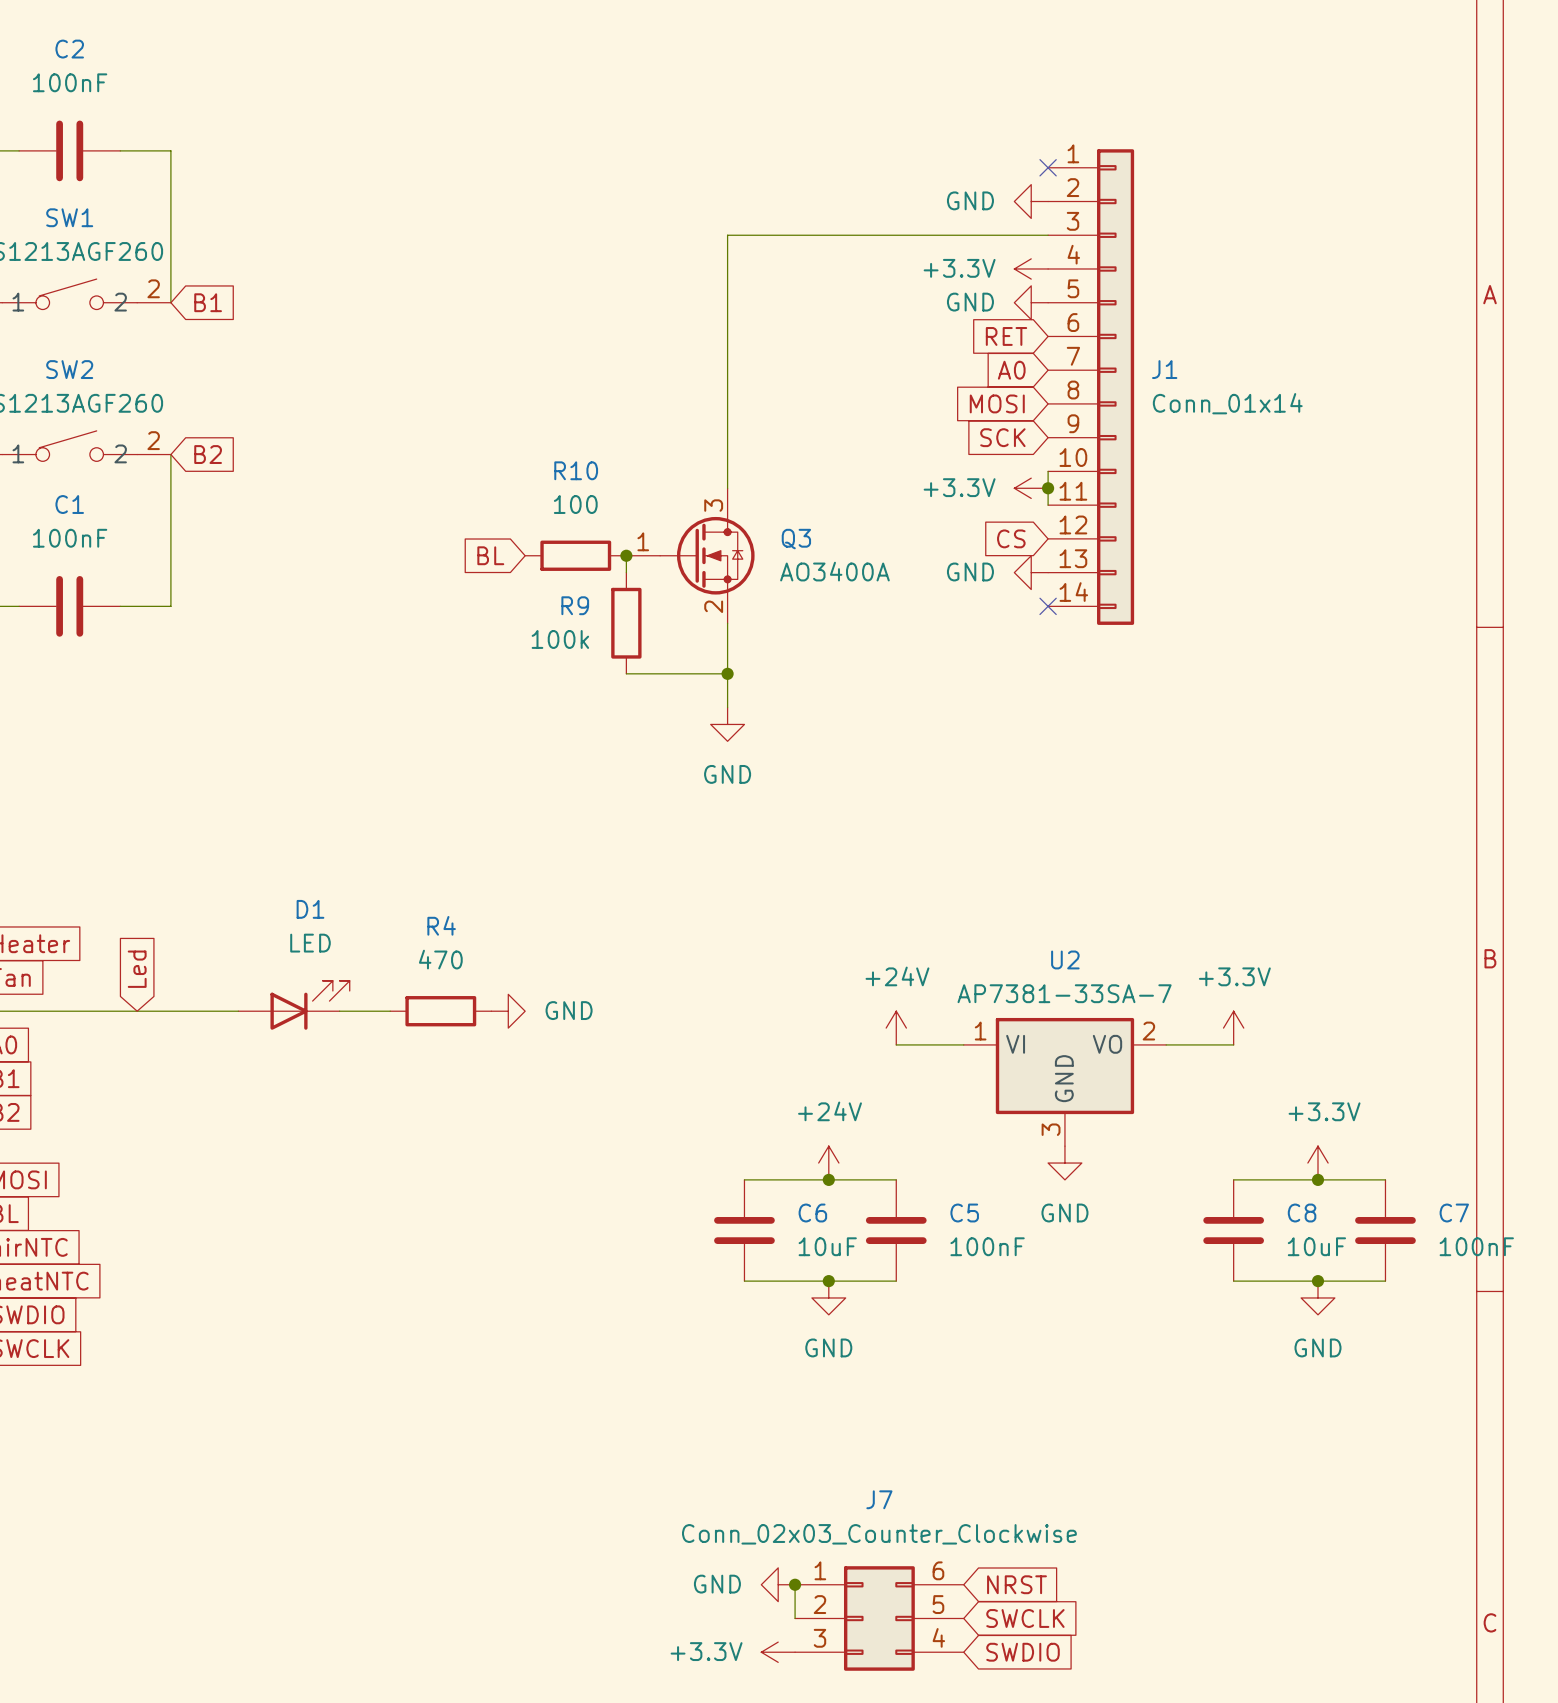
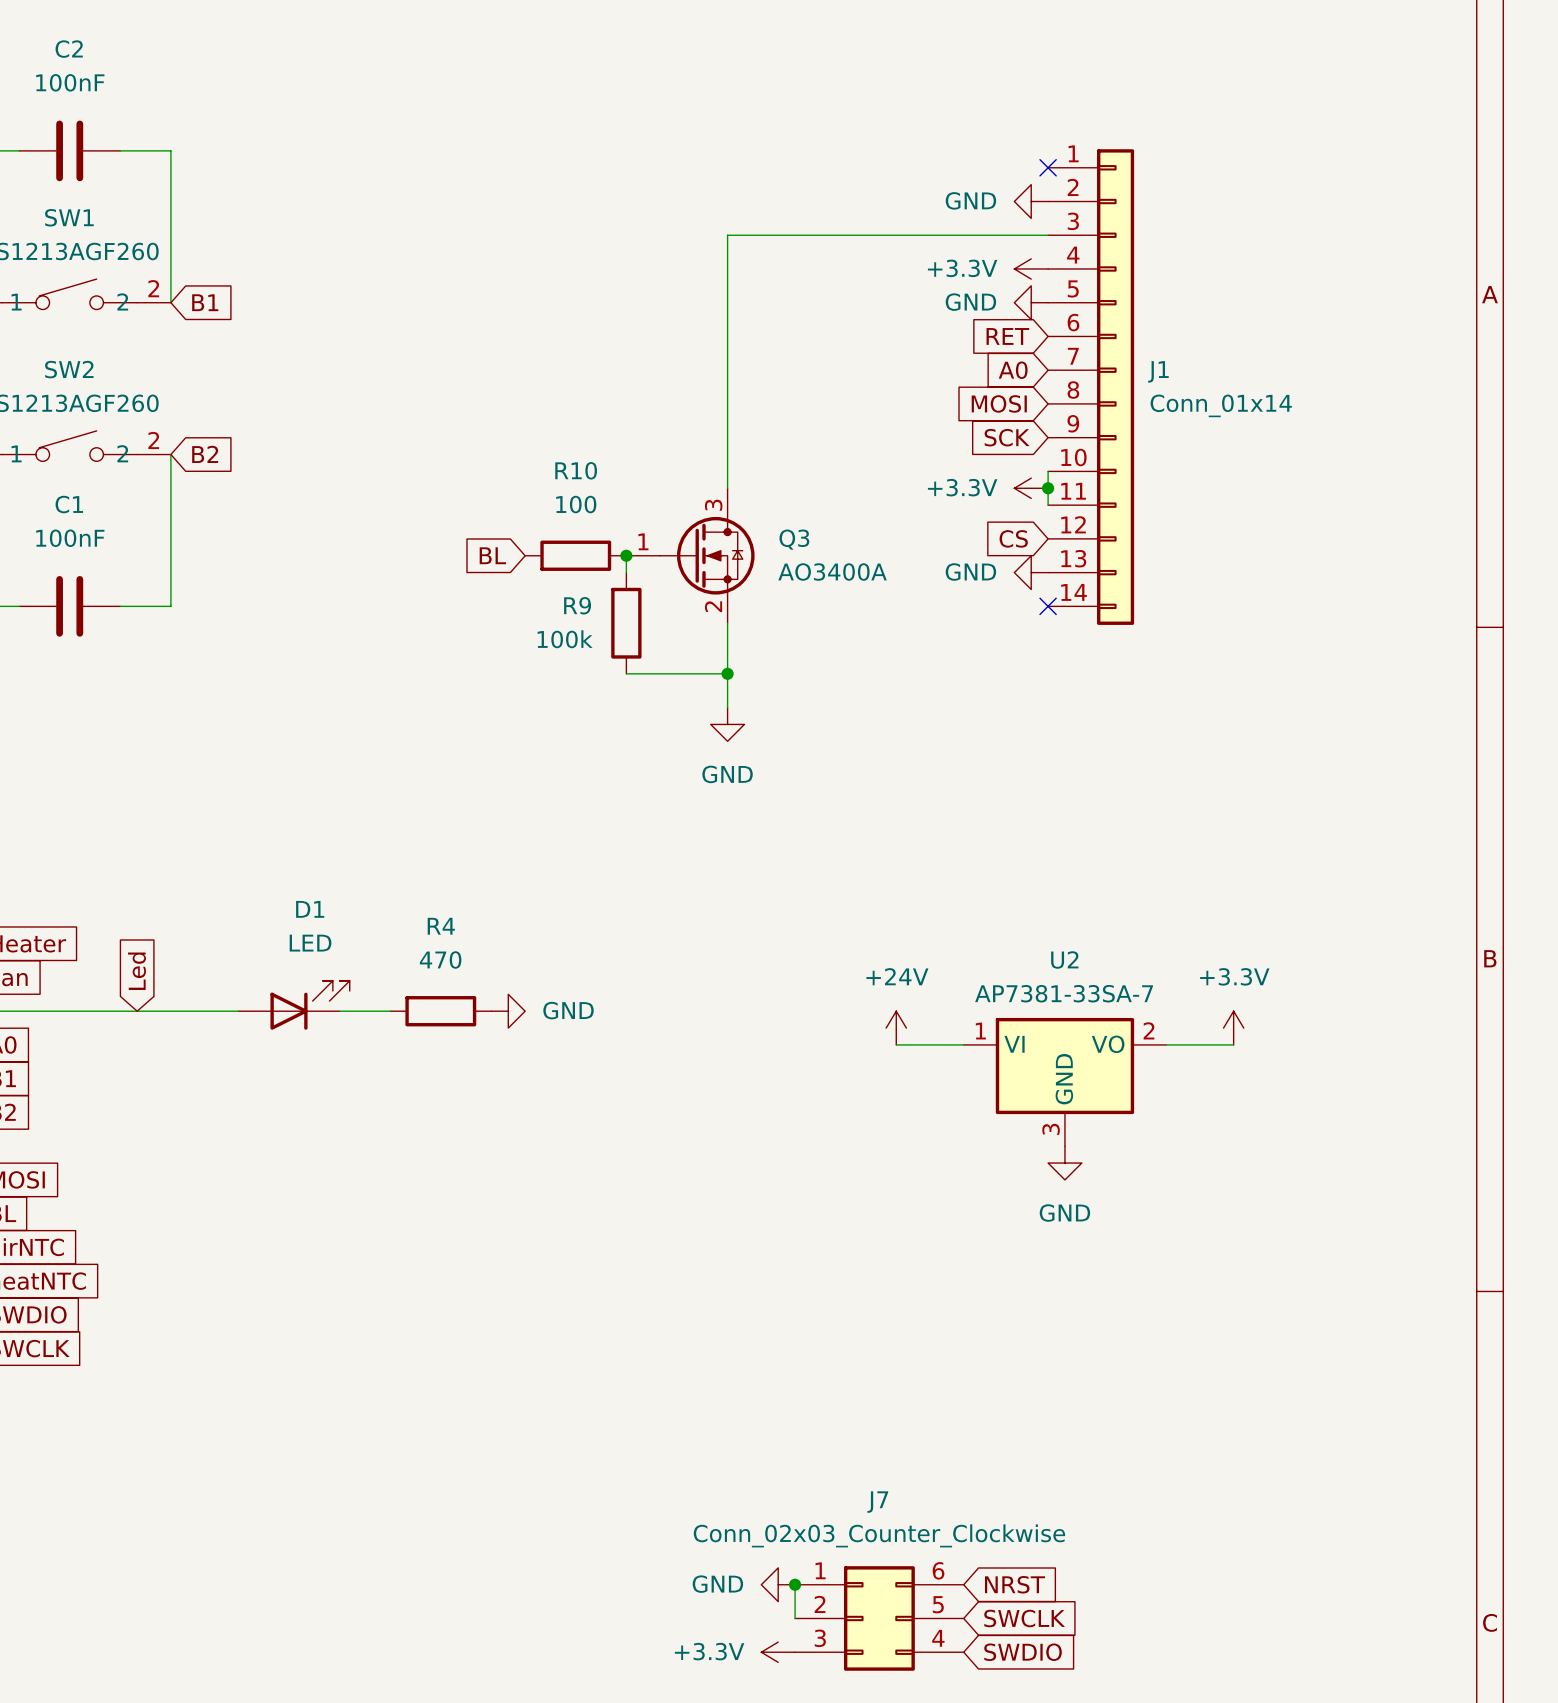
power symbol: +24V (828, 1163) -> none
power symbol: +3.3V (1317, 1163) -> none
wire: (744, 1179) (896, 1179) -> none
junction: (828, 1179) -> none
wire: (1233, 1179) (1385, 1179) -> none
junction: (1317, 1179) -> none
C6: 10uF (744, 1230) -> none
C5: 100nF (896, 1230) -> none
C8: 10uF (1233, 1230) -> none
C7: 100nF (1385, 1230) -> none
wire: (744, 1281) (896, 1281) -> none
junction: (828, 1281) -> none
wire: (1233, 1281) (1385, 1281) -> none
junction: (1317, 1281) -> none
power symbol: GND (828, 1297) -> none
power symbol: GND (1317, 1297) -> none

